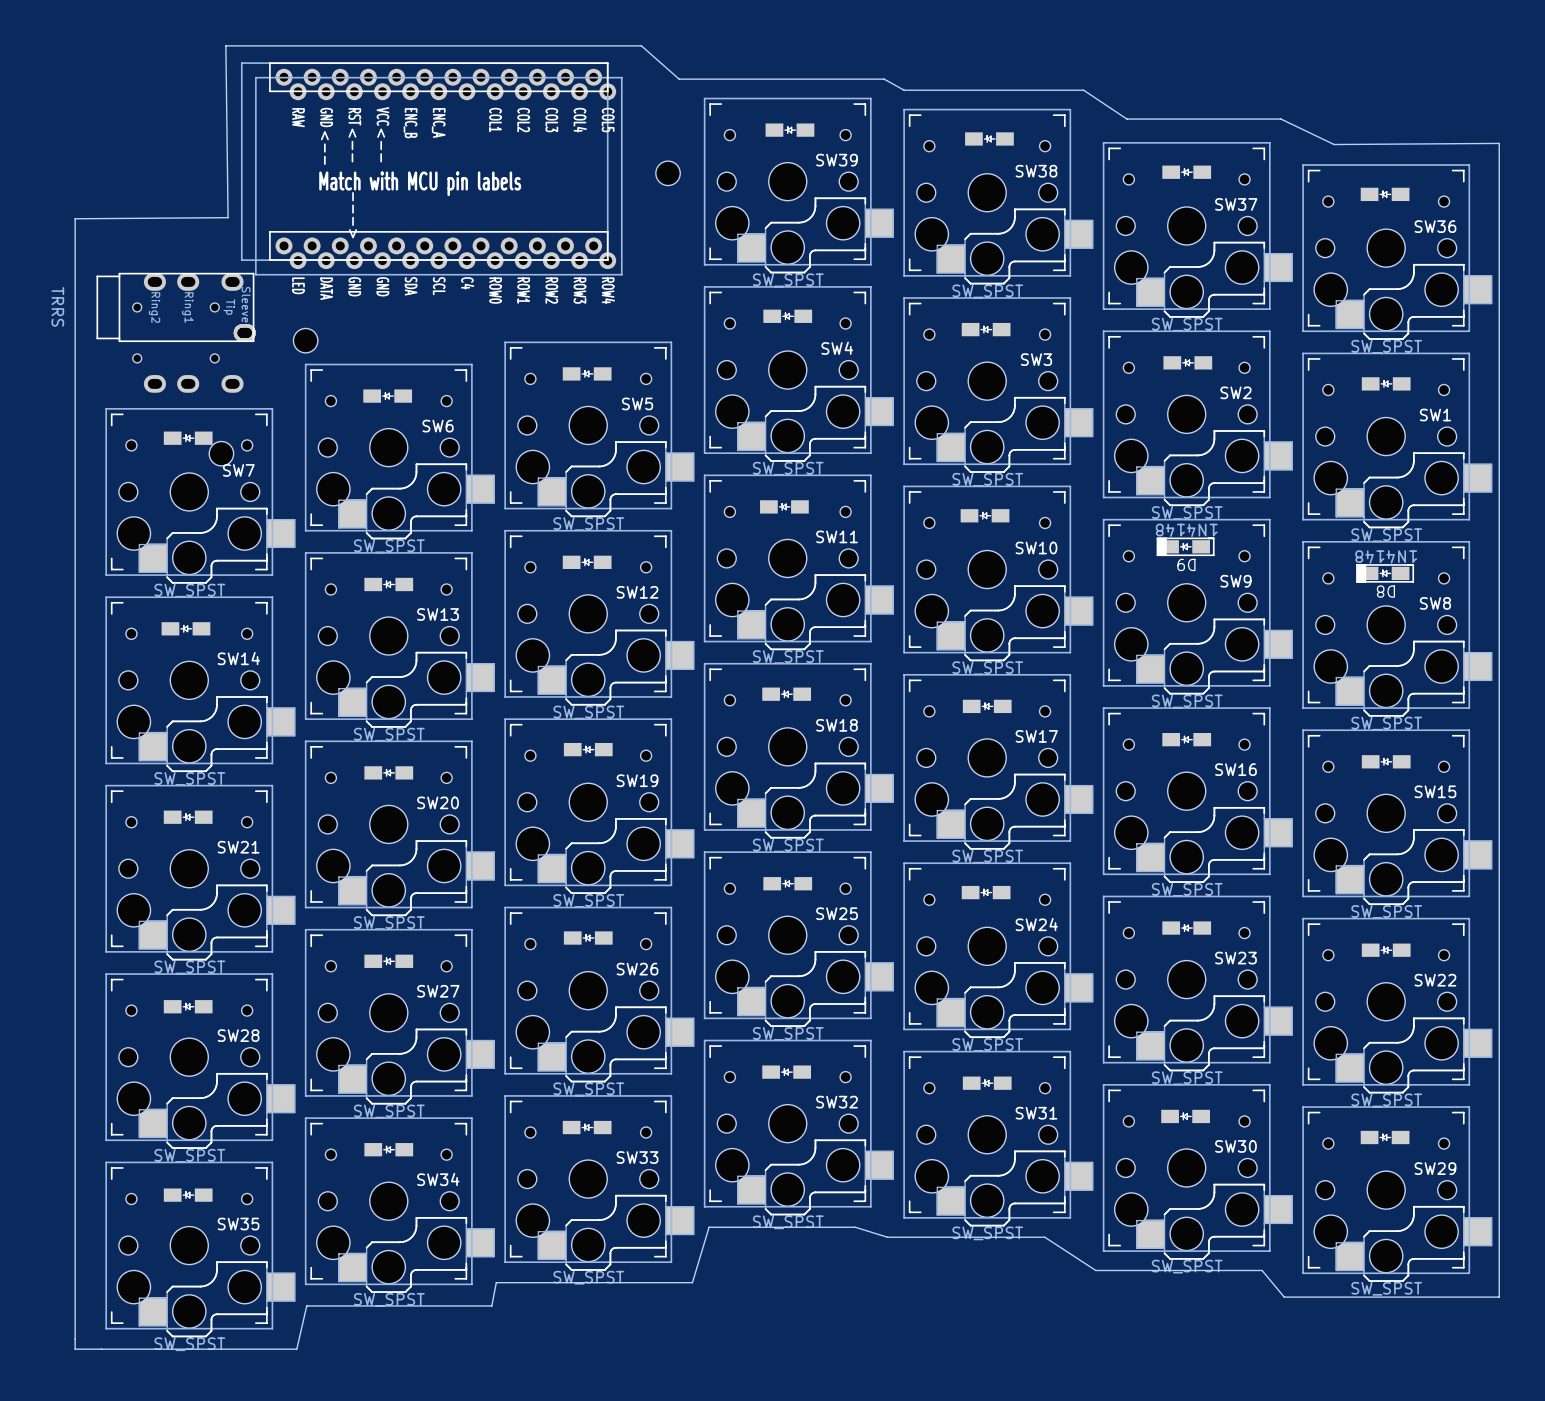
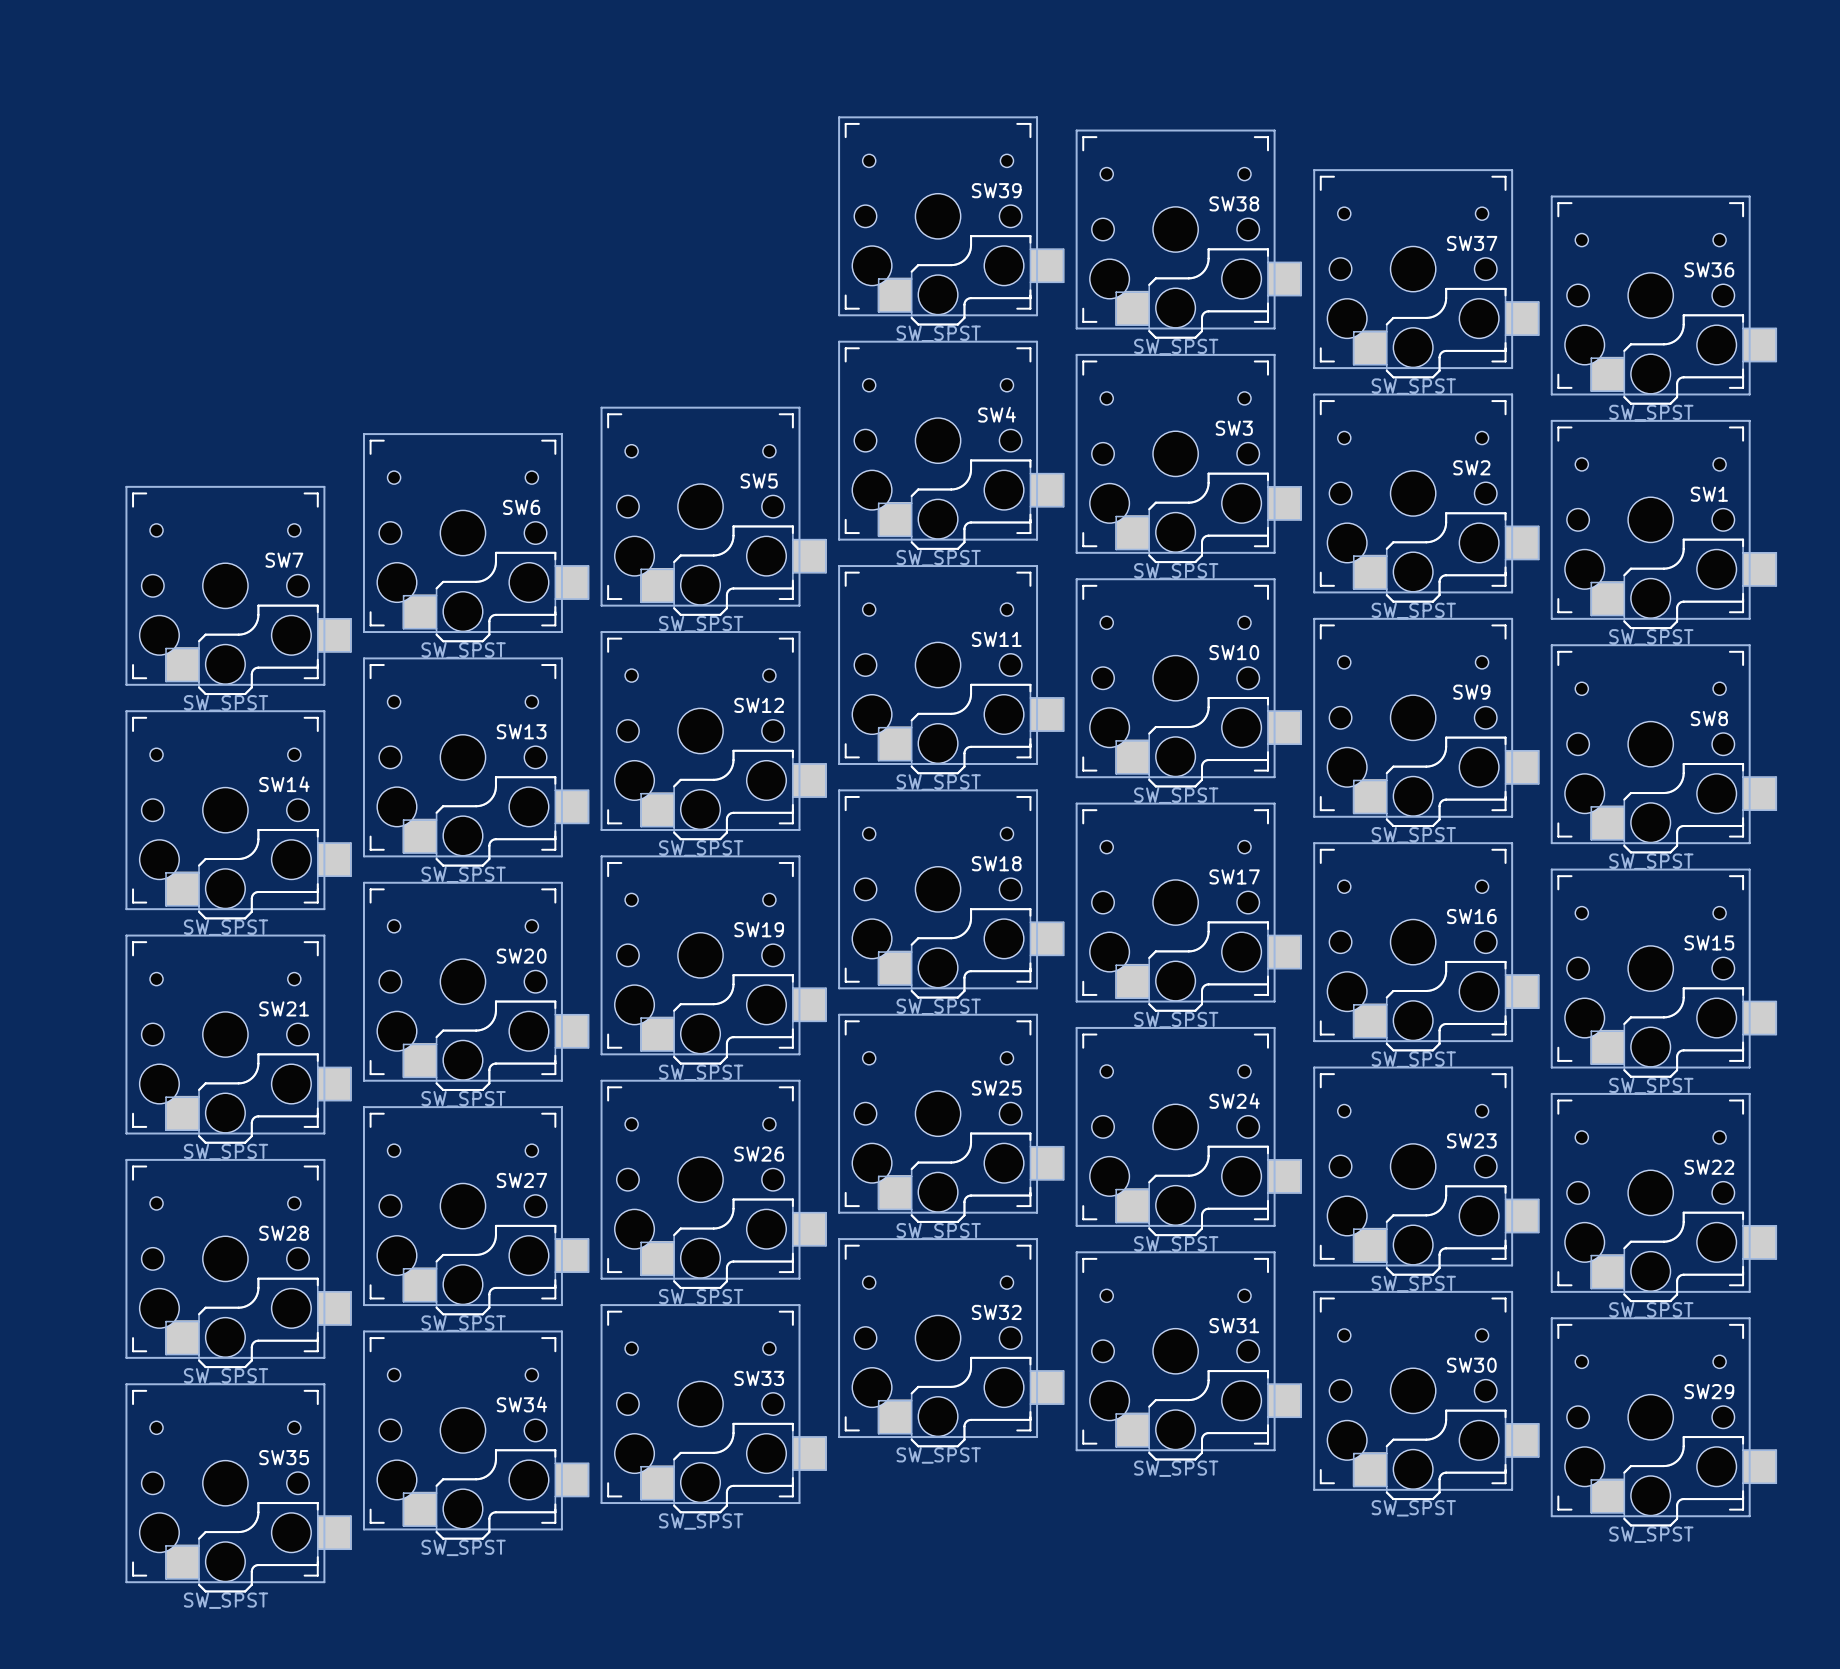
board edge: (641, 45) (679, 79) (884, 79) (904, 90) (1083, 90) (1126, 119) (1280, 119) (1334, 144) (1499, 143) (1499, 1297) (1284, 1297) (1262, 1270) (1095, 1270) (1044, 1237) (887, 1237) (855, 1227) (709, 1227) (692, 1282) (496, 1282) (491, 1305) (306, 1305) (296, 1349) (75, 1349) (75, 218) (228, 217) (225, 45) (641, 45) -> none
part: (789, 130) -> none
part: (989, 138) -> none
part: (431, 168) -> none
part: (1186, 172) -> none
part: (668, 173) -> none
part: (1385, 194) -> none
part: TRRS (176, 307) -> none
part: (787, 316) -> none
part: (986, 329) -> none
part: (305, 340) -> none
part: (194, 358) -> none
part: (1187, 362) -> none
part: (587, 373) -> none
part: (1386, 383) -> none
part: (387, 396) -> none
part: (188, 438) -> none
part: (221, 453) -> none
part: (784, 506) -> none
part: (985, 515) -> none
D9: 1N4148 (1185, 546) -> none
part: (587, 562) -> none
D8: 1N4148 (1385, 573) -> none
part: (388, 584) -> none
part: (185, 628) -> none
part: (786, 694) -> none
part: (987, 706) -> none
part: (1186, 739) -> none
part: (588, 749) -> none
part: (1386, 761) -> none
part: (388, 772) -> none
part: (188, 817) -> none
part: (787, 883) -> none
part: (986, 892) -> none
part: (1186, 928) -> none
part: (588, 938) -> none
part: (1386, 950) -> none
part: (388, 961) -> none
part: (188, 1006) -> none
part: (786, 1072) -> none
part: (987, 1083) -> none
part: (1185, 1116) -> none
part: (587, 1127) -> none
part: (1385, 1137) -> none
part: (388, 1149) -> none
part: (188, 1195) -> none

